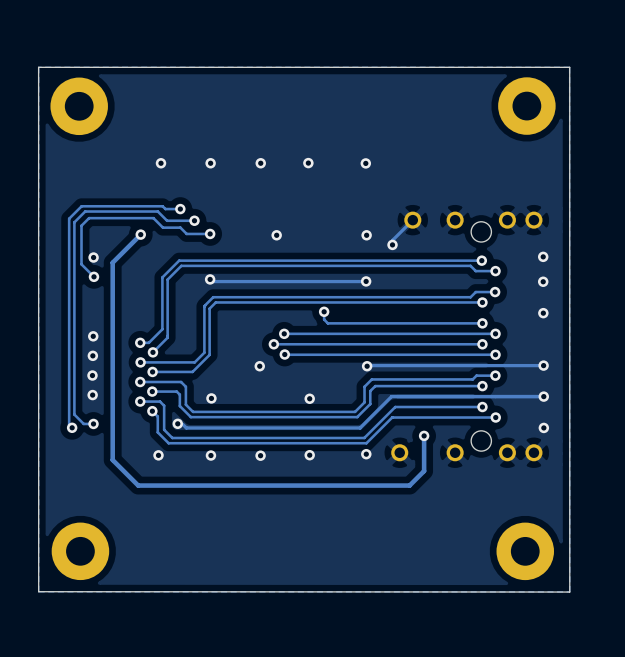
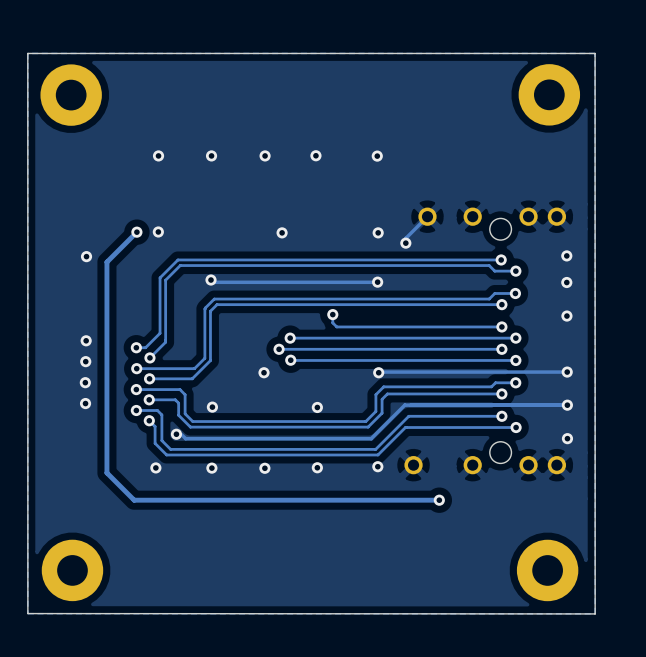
track: (180, 209) (165, 209) (162, 206) (81, 206) (69, 218) (69, 424) (72, 427) -> none
via: (180, 209) -> none
track: (194, 220) (167, 220) (157, 211) (85, 211) (74, 222) (74, 414) (83, 423) (93, 423) -> none
via: (194, 220) -> none
track: (210, 233) (186, 233) (180, 227) (162, 227) (153, 218) (89, 218) (81, 225) (81, 264) (93, 276) -> none
via: (210, 233) -> none
via: none -> (158, 231)
via: (93, 276) -> none
via: (93, 423) -> none
via: (72, 427) -> none
track: (424, 435) (424, 471) (409, 485) -> (439, 500) (424, 500)
via position: (424, 435) -> (439, 500)

